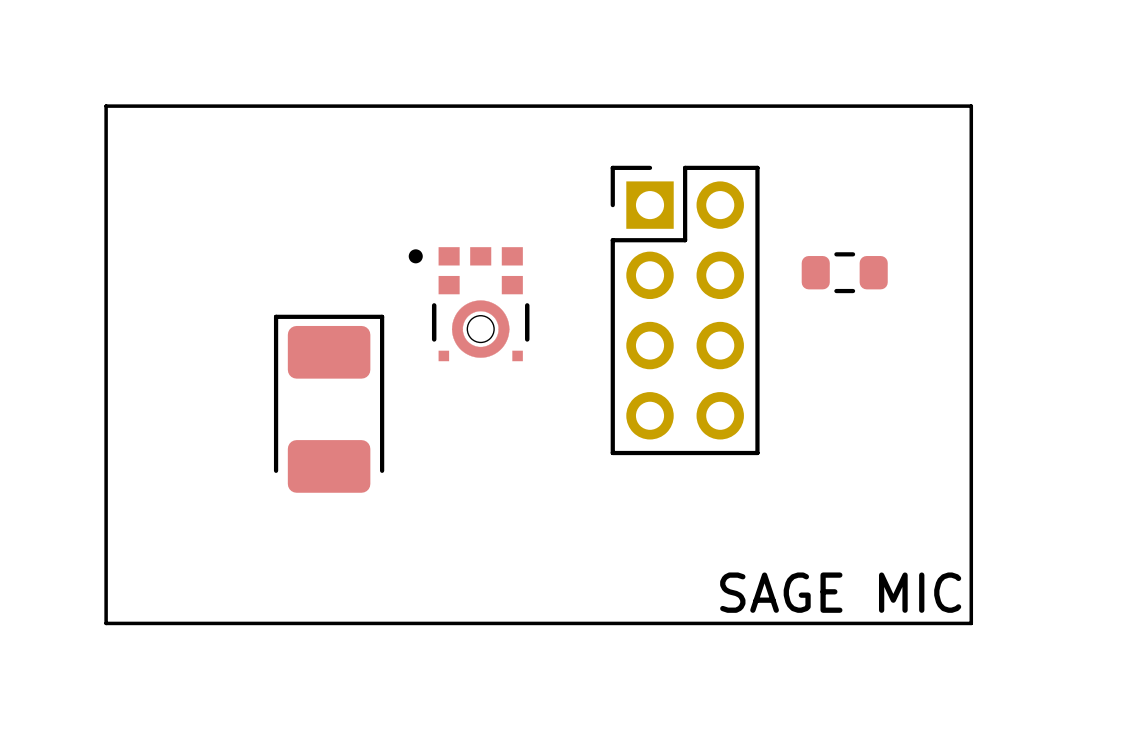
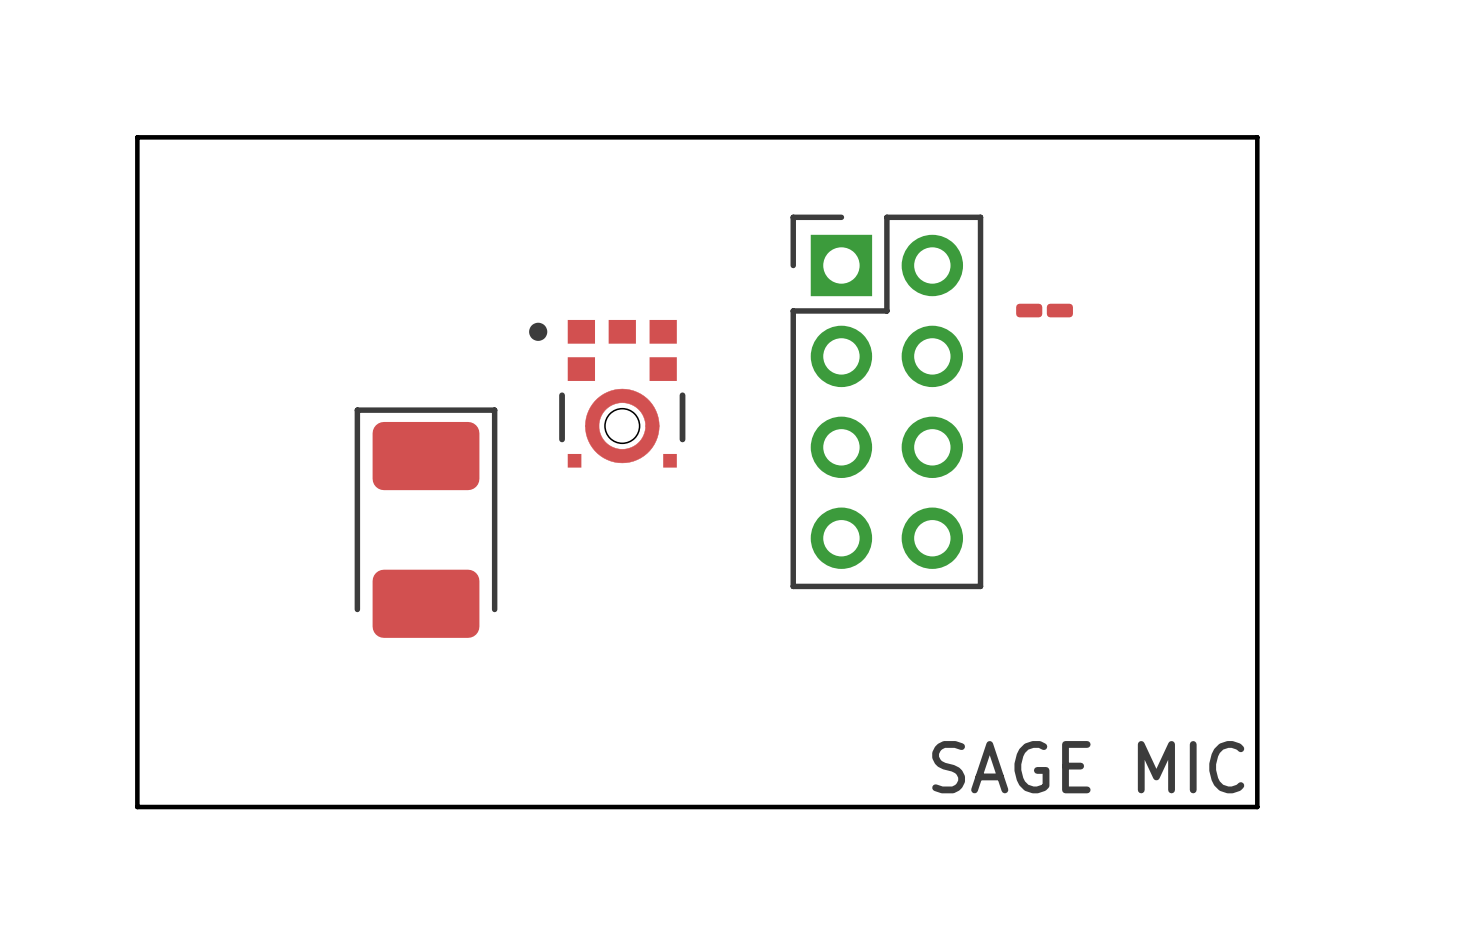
part: none -> (1044, 310)
part: (844, 272) -> none

